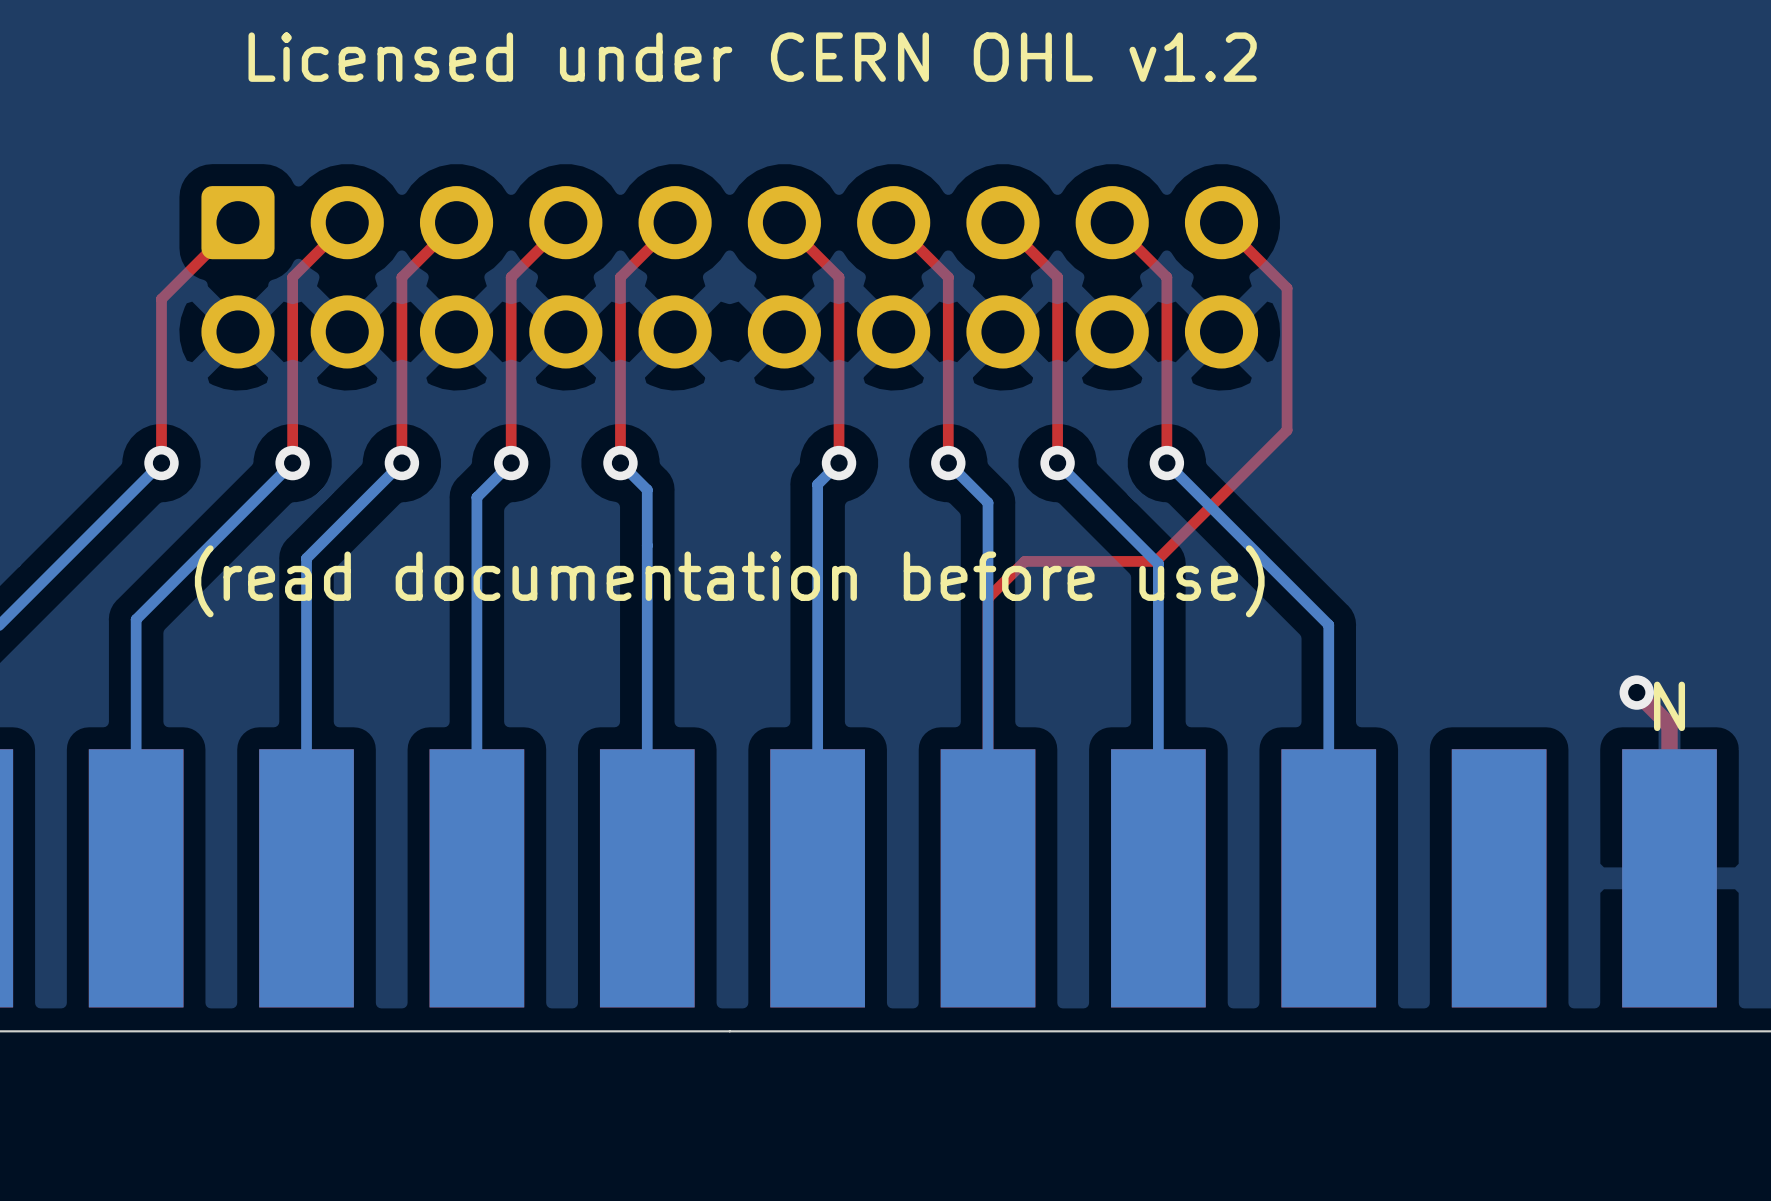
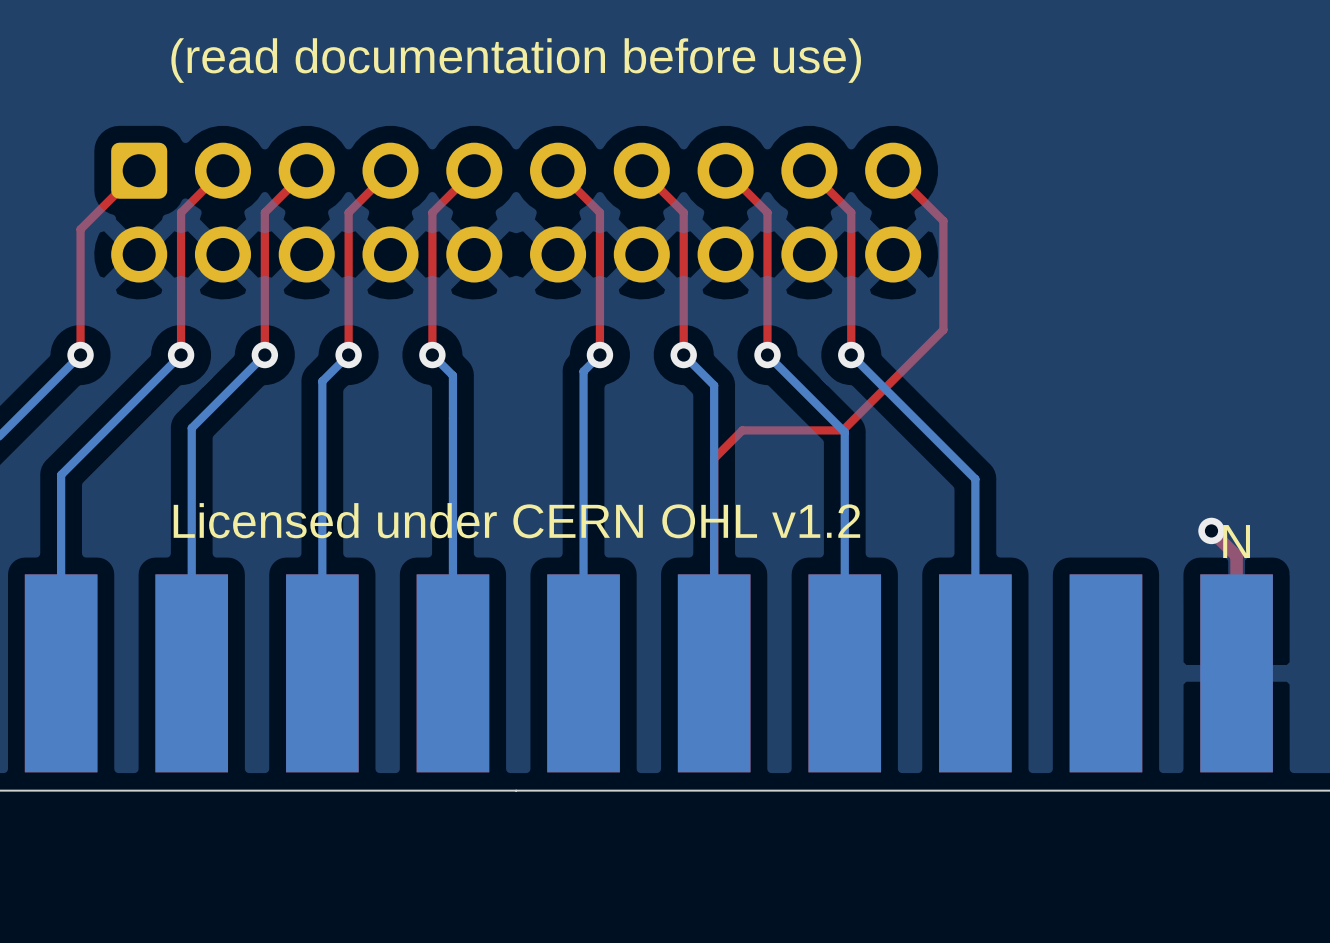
text position: Licensed under CERN OHL v1.2 (752, 57) -> Licensed under CERN OHL v1.2 (516, 520)
text position: (read documentation before use) (729, 581) -> (read documentation before use) (516, 60)

